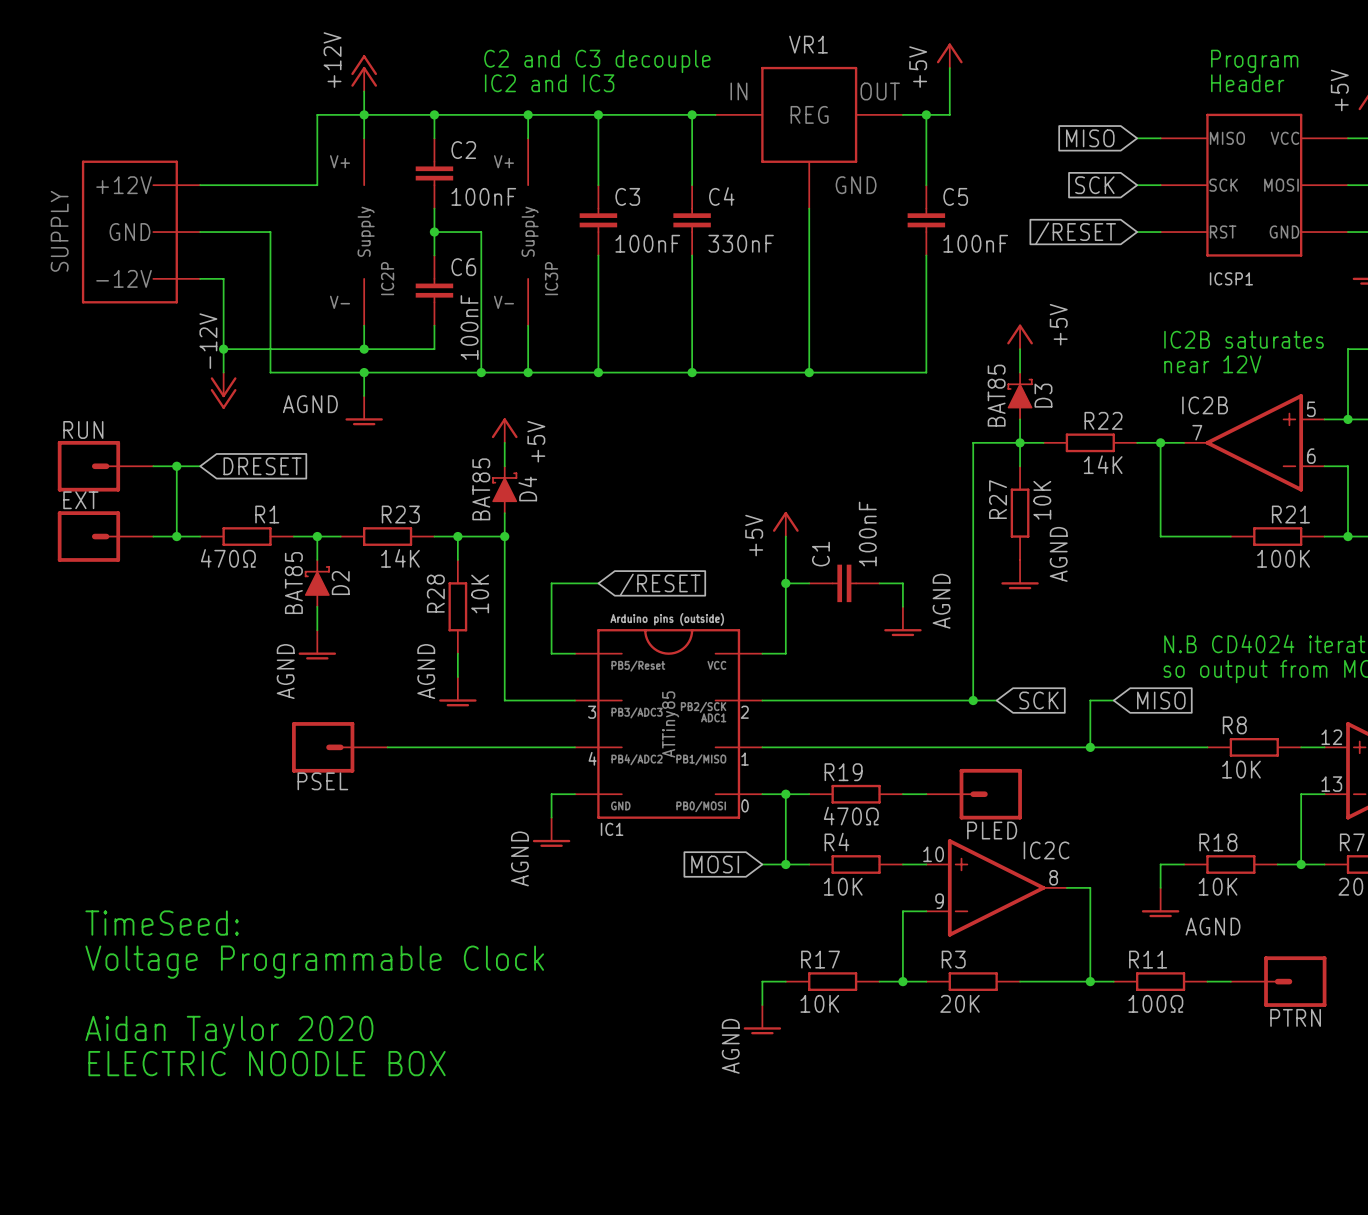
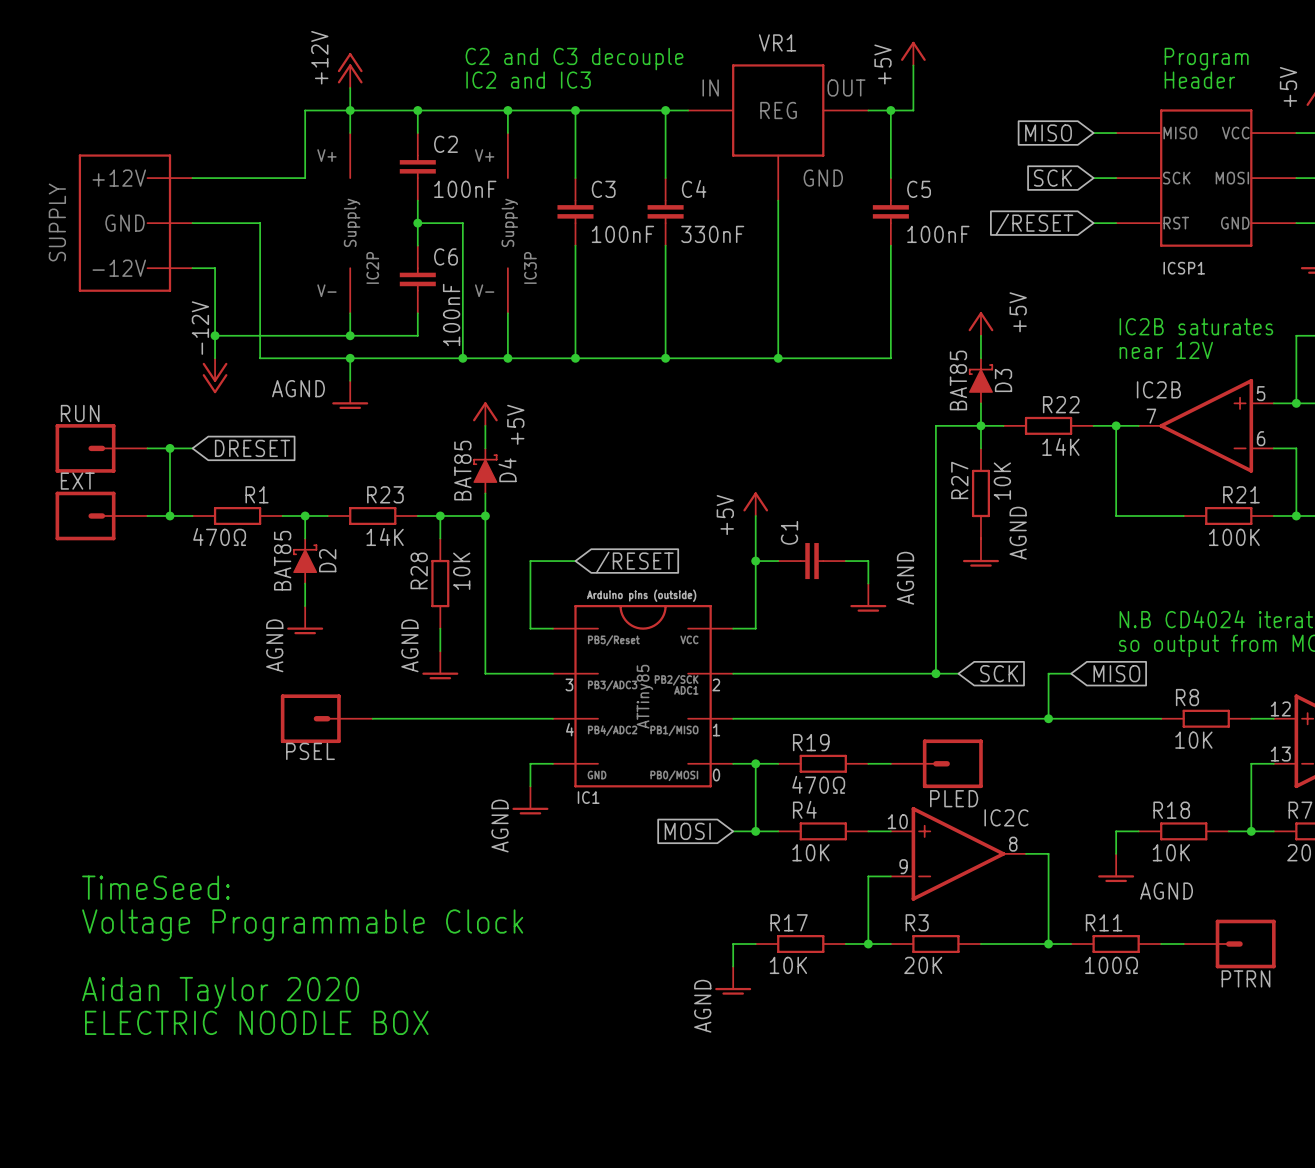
C1 value: 100nF (867, 534) -> none

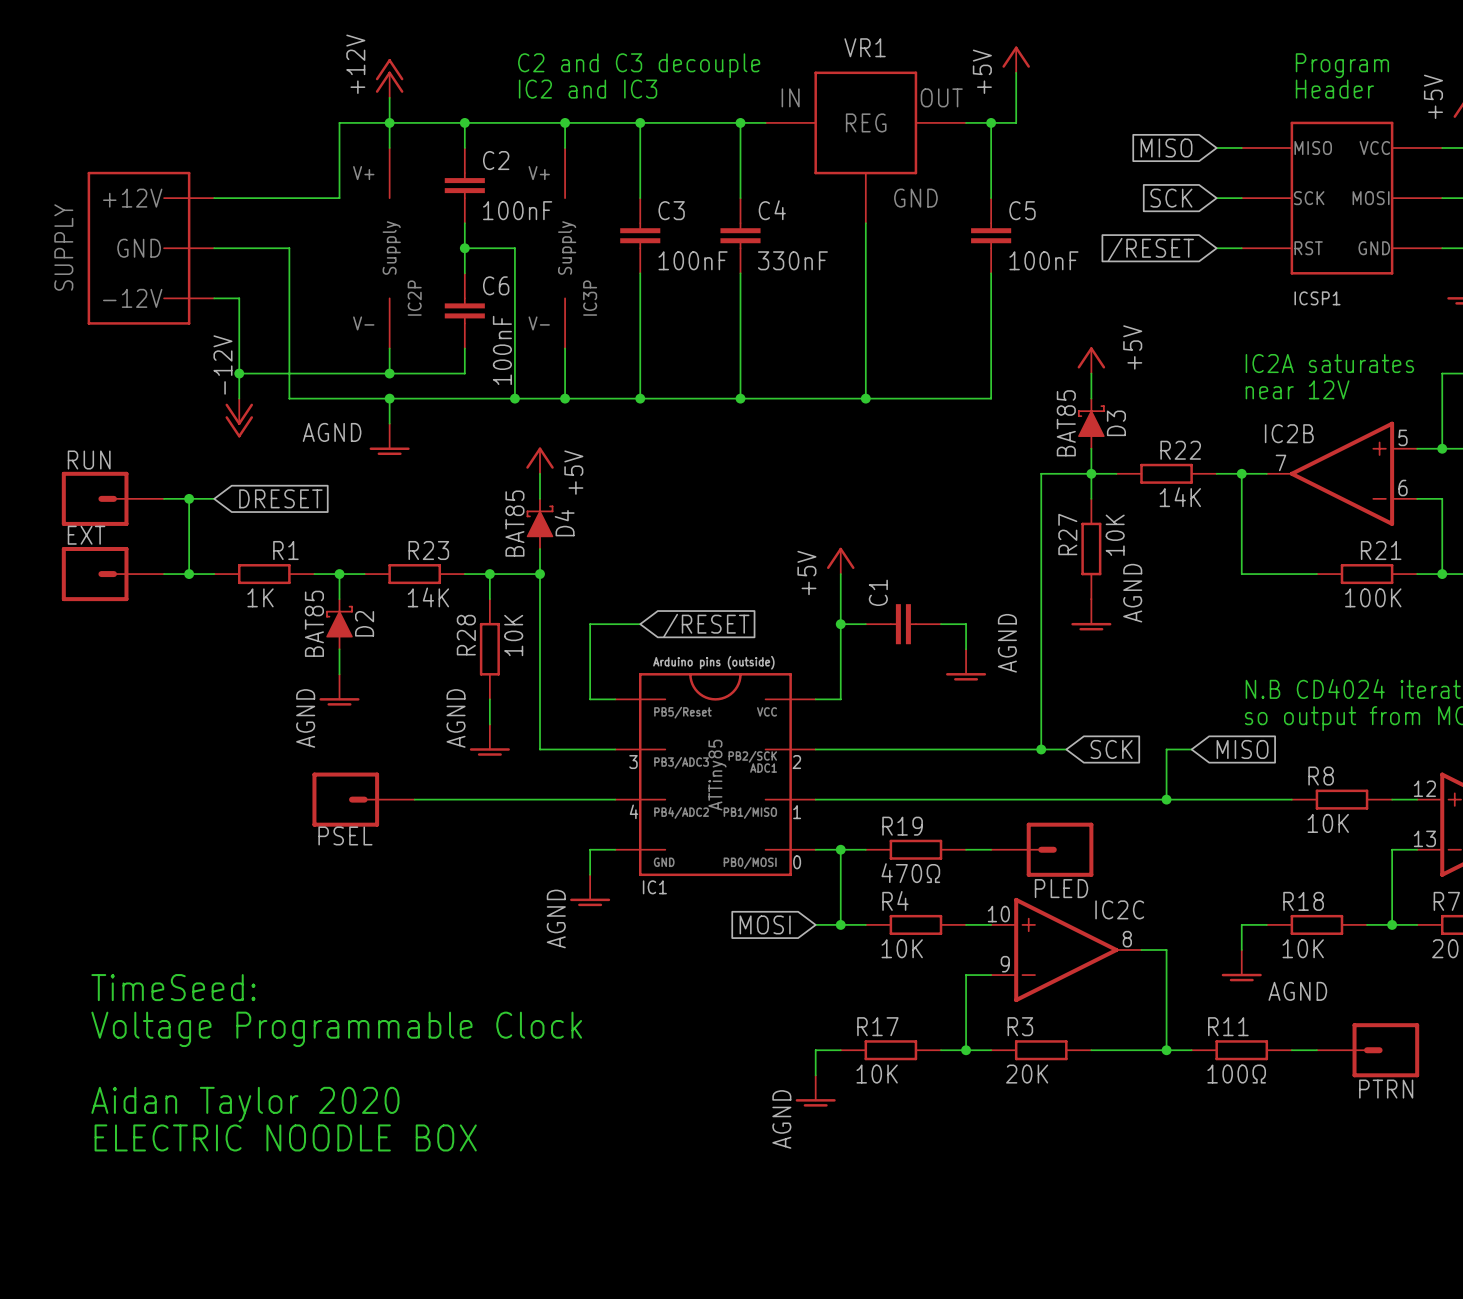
text: IC2B saturates (1196, 326) -> IC2A saturates (1329, 363)
R1 value: 470Ω (219, 537) -> 1K (260, 597)

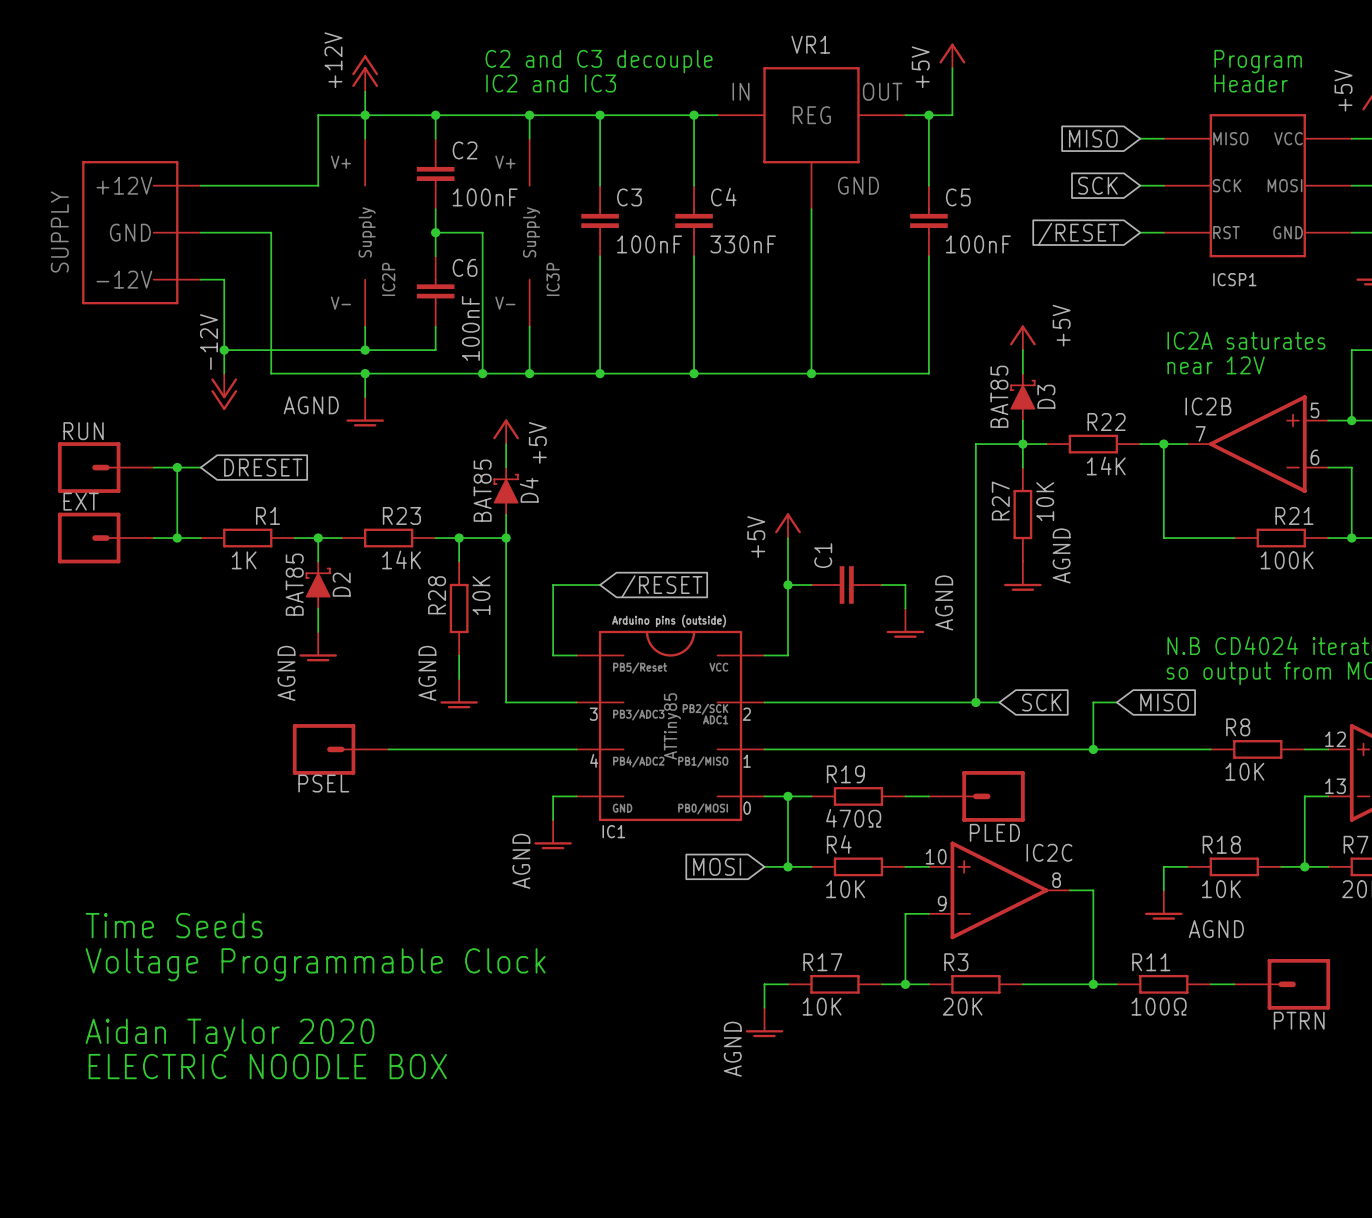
text: TimeSeed: (173, 987) -> Time Seeds (174, 925)

